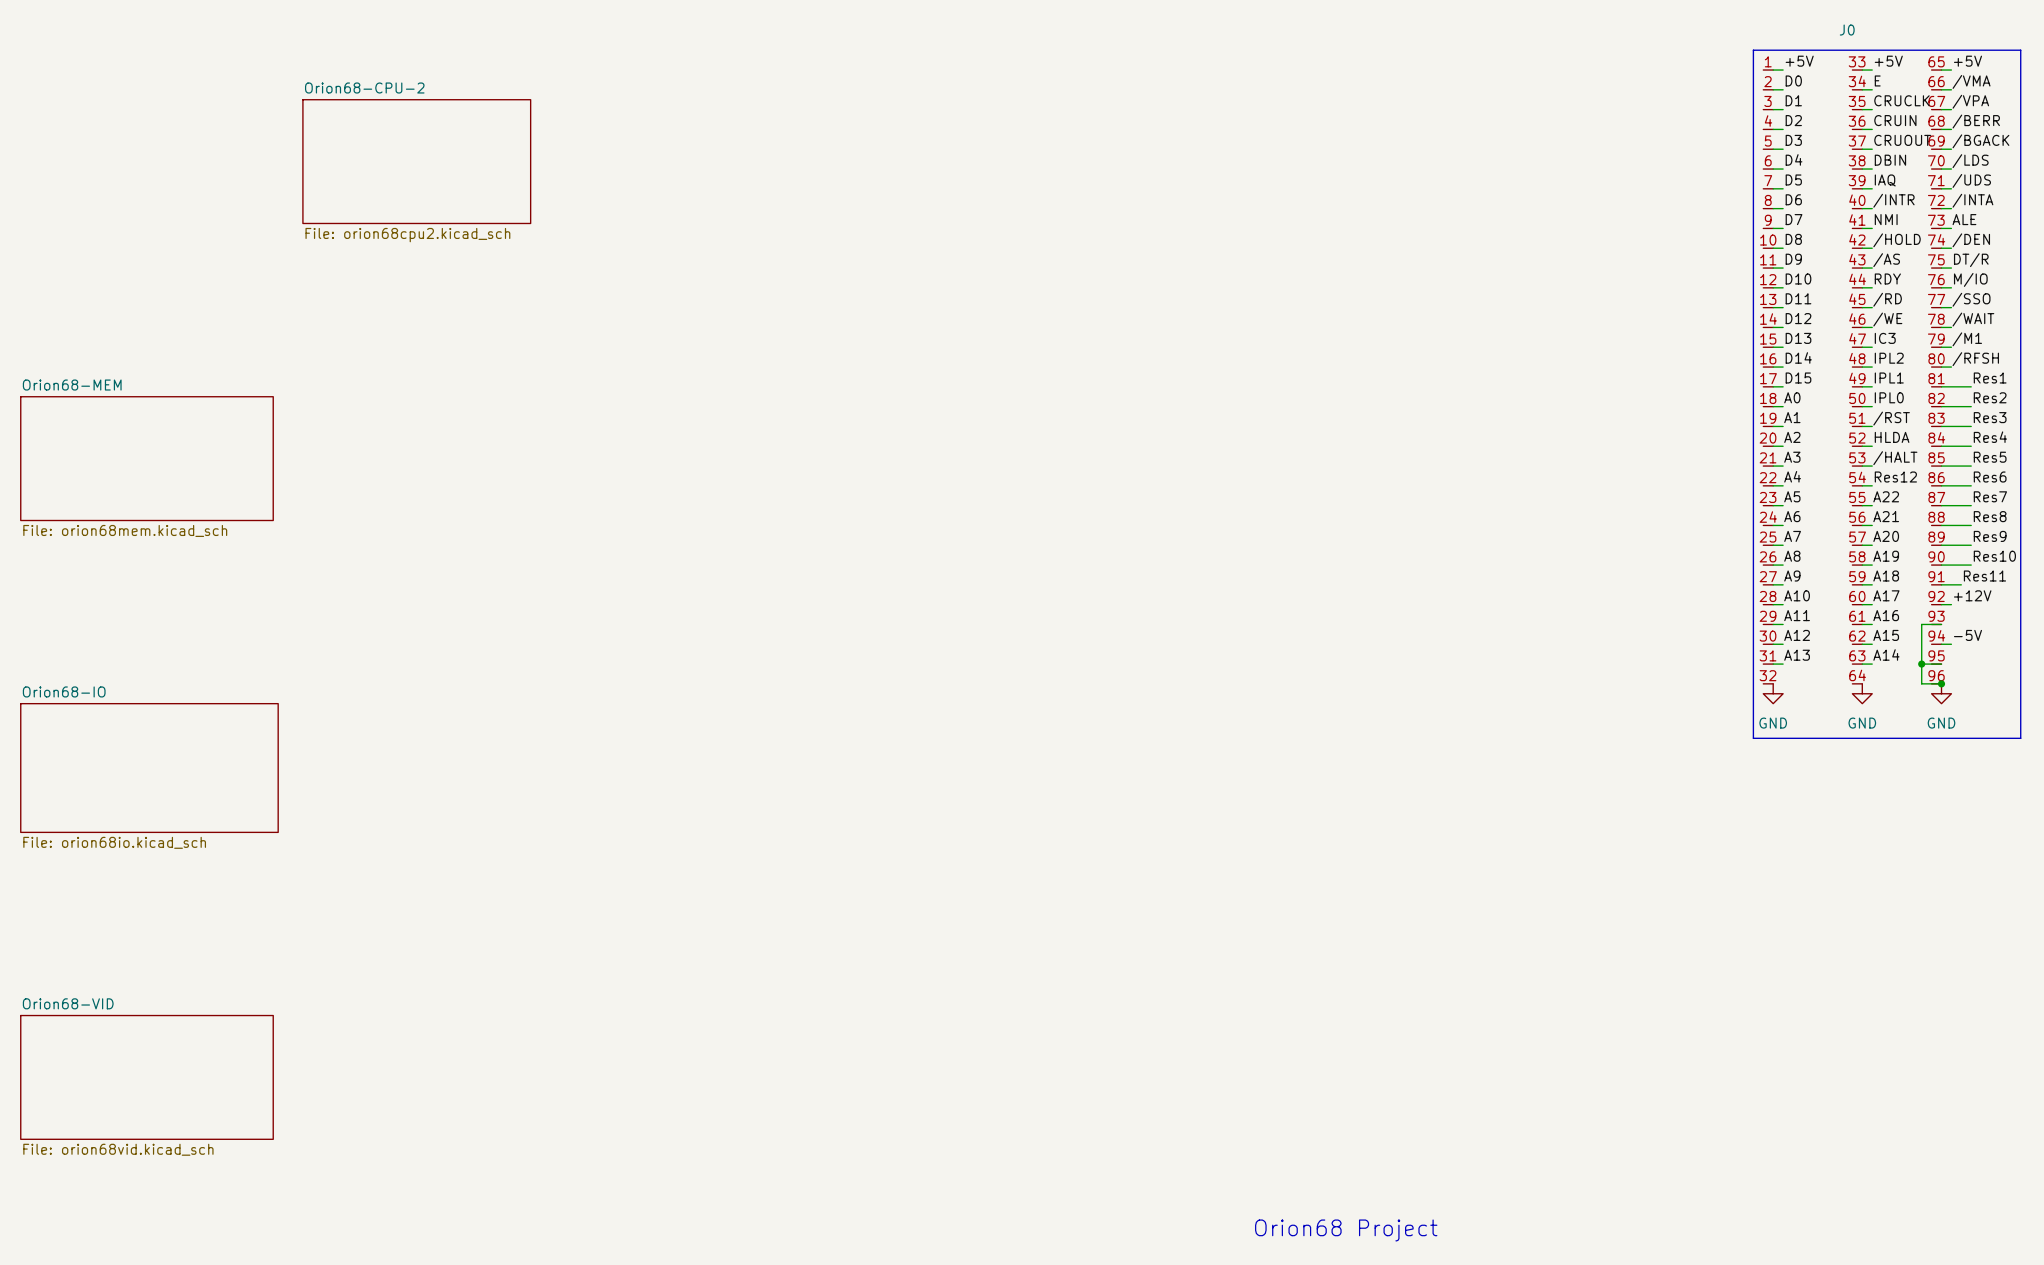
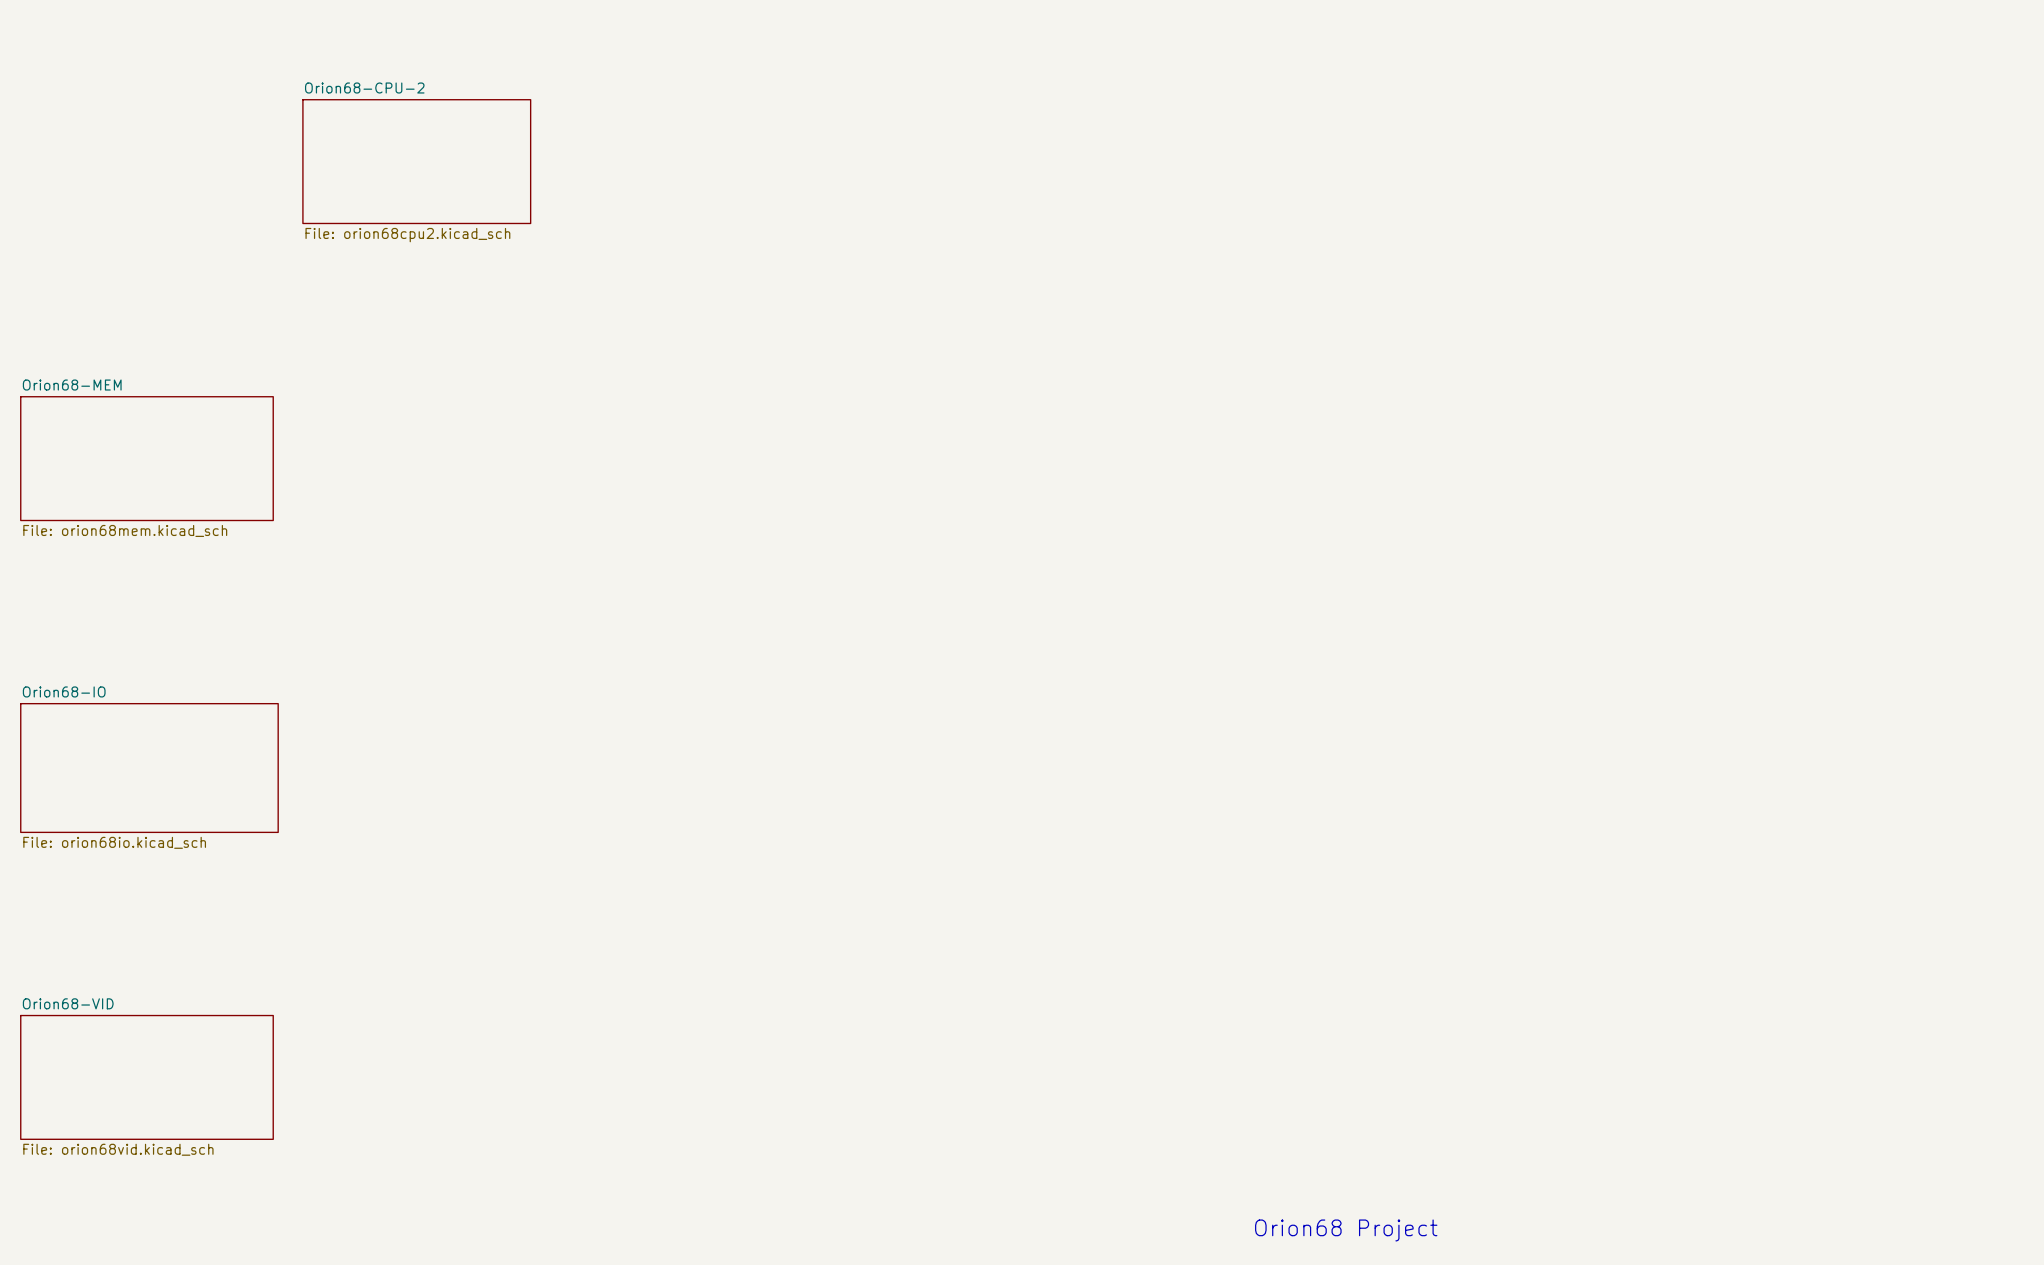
line: (1753, 50) (2020, 50) (2020, 738) (1753, 738) (1753, 50) -> none
label: +5V (1799, 61) -> none
label: +5V (1888, 61) -> none
label: +5V (1967, 61) -> none
wire: (1773, 70) (1783, 70) -> none
wire: (1862, 70) (1872, 70) -> none
wire: (1941, 70) (1951, 70) -> none
label: D0 (1793, 80) -> none
label: E (1877, 80) -> none
label: /VMA (1971, 81) -> none
wire: (1773, 89) (1783, 89) -> none
wire: (1862, 89) (1872, 89) -> none
wire: (1941, 89) (1951, 89) -> none
label: D1 (1793, 100) -> none
label: CRUCLK (1901, 100) -> none
label: /VPA (1970, 101) -> none
wire: (1773, 109) (1783, 109) -> none
wire: (1862, 109) (1872, 109) -> none
wire: (1941, 109) (1951, 109) -> none
label: D2 (1793, 120) -> none
label: CRUIN (1895, 120) -> none
label: /BERR (1976, 121) -> none
wire: (1773, 129) (1783, 129) -> none
wire: (1862, 129) (1872, 129) -> none
wire: (1941, 129) (1951, 129) -> none
label: D3 (1793, 140) -> none
label: CRUOUT (1902, 140) -> none
label: /BGACK (1980, 141) -> none
wire: (1773, 149) (1783, 149) -> none
wire: (1862, 149) (1872, 149) -> none
wire: (1941, 149) (1951, 149) -> none
label: D4 (1794, 159) -> none
label: DBIN (1890, 160) -> none
label: /LDS (1970, 161) -> none
wire: (1773, 169) (1783, 169) -> none
wire: (1862, 169) (1872, 169) -> none
wire: (1941, 169) (1951, 169) -> none
label: D5 (1793, 179) -> none
label: IAQ (1885, 180) -> none
label: /UDS (1971, 180) -> none
wire: (1773, 188) (1783, 188) -> none
wire: (1862, 188) (1872, 188) -> none
wire: (1941, 188) (1951, 188) -> none
label: D6 (1793, 199) -> none
label: /INTR (1893, 200) -> none
label: /INTA (1972, 200) -> none
wire: (1773, 208) (1783, 208) -> none
wire: (1862, 208) (1872, 208) -> none
wire: (1941, 208) (1951, 208) -> none
label: D7 (1794, 219) -> none
label: NMI (1886, 219) -> none
label: ALE (1964, 219) -> none
wire: (1773, 228) (1783, 228) -> none
wire: (1862, 228) (1872, 228) -> none
wire: (1941, 228) (1951, 228) -> none
label: D8 (1793, 239) -> none
label: /HOLD (1897, 240) -> none
label: /DEN (1971, 240) -> none
wire: (1773, 248) (1783, 248) -> none
wire: (1862, 248) (1872, 248) -> none
wire: (1941, 248) (1951, 248) -> none
label: D9 (1793, 259) -> none
label: /AS (1886, 260) -> none
label: DT/R (1971, 260) -> none
wire: (1773, 268) (1783, 268) -> none
wire: (1862, 268) (1872, 268) -> none
wire: (1941, 268) (1951, 268) -> none
label: D10 (1798, 278) -> none
label: RDY (1887, 278) -> none
label: M/IO (1970, 279) -> none
wire: (1773, 287) (1783, 287) -> none
wire: (1862, 287) (1872, 287) -> none
wire: (1941, 287) (1951, 287) -> none
label: D11 (1798, 298) -> none
label: /RD (1887, 299) -> none
label: /SSO (1971, 299) -> none
wire: (1773, 307) (1783, 307) -> none
wire: (1862, 307) (1872, 307) -> none
wire: (1941, 307) (1951, 307) -> none
label: D12 (1798, 318) -> none
label: /WE (1887, 319) -> none
label: /WAIT (1973, 319) -> none
wire: (1773, 327) (1783, 327) -> none
wire: (1862, 327) (1872, 327) -> none
wire: (1941, 327) (1951, 327) -> none
label: D13 (1798, 338) -> none
label: IC3 (1885, 338) -> none
label: /M1 (1967, 339) -> none
wire: (1773, 347) (1783, 347) -> none
wire: (1862, 347) (1872, 347) -> none
wire: (1941, 347) (1951, 347) -> none
label: D14 (1798, 357) -> none
label: IPL2 (1889, 358) -> none
label: /RFSH (1975, 359) -> none
wire: (1773, 367) (1783, 367) -> none
wire: (1862, 367) (1872, 367) -> none
wire: (1941, 367) (1951, 367) -> none
J0: (1852, 376) -> none
label: D15 (1798, 378) -> none
label: IPL1 (1889, 378) -> none
label: Res1 (1990, 378) -> none
wire: (1773, 386) (1783, 386) -> none
wire: (1862, 386) (1872, 386) -> none
wire: (1941, 386) (1971, 386) -> none
label: A0 (1792, 397) -> none
label: IPL0 (1889, 397) -> none
label: Res2 (1990, 397) -> none
wire: (1773, 406) (1783, 406) -> none
wire: (1862, 406) (1872, 406) -> none
wire: (1941, 406) (1971, 406) -> none
label: A1 (1792, 417) -> none
label: Res3 (1990, 417) -> none
label: /RST (1891, 418) -> none
wire: (1773, 426) (1783, 426) -> none
wire: (1862, 426) (1872, 426) -> none
wire: (1941, 426) (1971, 426) -> none
label: A2 (1792, 437) -> none
label: HLDA (1892, 437) -> none
label: Res4 (1990, 437) -> none
wire: (1773, 446) (1783, 446) -> none
wire: (1862, 446) (1872, 446) -> none
wire: (1941, 446) (1971, 446) -> none
label: A3 (1792, 457) -> none
label: Res5 (1990, 457) -> none
label: /HALT (1895, 458) -> none
wire: (1773, 466) (1783, 466) -> none
wire: (1862, 466) (1872, 466) -> none
wire: (1941, 466) (1971, 466) -> none
label: A4 (1792, 476) -> none
label: Res12 (1895, 477) -> none
label: Res6 (1990, 477) -> none
wire: (1773, 485) (1783, 485) -> none
wire: (1862, 485) (1872, 485) -> none
wire: (1941, 485) (1971, 485) -> none
label: A5 (1792, 496) -> none
label: A22 (1886, 496) -> none
label: Res7 (1990, 496) -> none
wire: (1773, 505) (1783, 505) -> none
wire: (1862, 505) (1872, 505) -> none
wire: (1941, 505) (1971, 505) -> none
label: A6 (1792, 516) -> none
label: A21 (1886, 516) -> none
label: Res8 (1990, 516) -> none
wire: (1773, 525) (1783, 525) -> none
wire: (1862, 525) (1872, 525) -> none
wire: (1941, 525) (1971, 525) -> none
label: A7 (1792, 536) -> none
label: A20 (1886, 536) -> none
label: Res9 (1990, 536) -> none
wire: (1773, 545) (1783, 545) -> none
wire: (1862, 545) (1872, 545) -> none
wire: (1941, 545) (1971, 545) -> none
label: A8 (1792, 556) -> none
label: A19 (1886, 556) -> none
label: Res10 (1994, 556) -> none
wire: (1773, 565) (1783, 565) -> none
wire: (1862, 565) (1872, 565) -> none
wire: (1941, 565) (1971, 565) -> none
label: A9 (1792, 576) -> none
label: A18 (1886, 576) -> none
label: Res11 (1984, 576) -> none
wire: (1773, 584) (1783, 584) -> none
wire: (1862, 584) (1872, 584) -> none
wire: (1941, 584) (1961, 584) -> none
label: A10 (1797, 595) -> none
label: A17 (1886, 595) -> none
label: +12V (1972, 595) -> none
wire: (1773, 604) (1783, 604) -> none
wire: (1862, 604) (1872, 604) -> none
wire: (1941, 604) (1951, 604) -> none
label: A11 (1797, 615) -> none
label: A16 (1886, 615) -> none
wire: (1773, 624) (1783, 624) -> none
wire: (1862, 624) (1872, 624) -> none
wire: (1941, 624) (1921, 624) (1921, 683) (1941, 683) -> none
label: A12 (1797, 635) -> none
label: A15 (1886, 635) -> none
label: -5V (1967, 635) -> none
wire: (1773, 644) (1783, 644) -> none
wire: (1862, 644) (1872, 644) -> none
wire: (1941, 644) (1951, 644) -> none
label: A14 (1886, 654) -> none
label: A13 (1797, 655) -> none
wire: (1773, 664) (1783, 664) -> none
wire: (1862, 664) (1872, 664) -> none
wire: (1921, 664) (1941, 664) -> none
junction: (1921, 664) -> none
junction: (1941, 683) -> none
power symbol: GND (1773, 693) -> none
power symbol: GND (1862, 693) -> none
power symbol: GND (1941, 693) -> none

